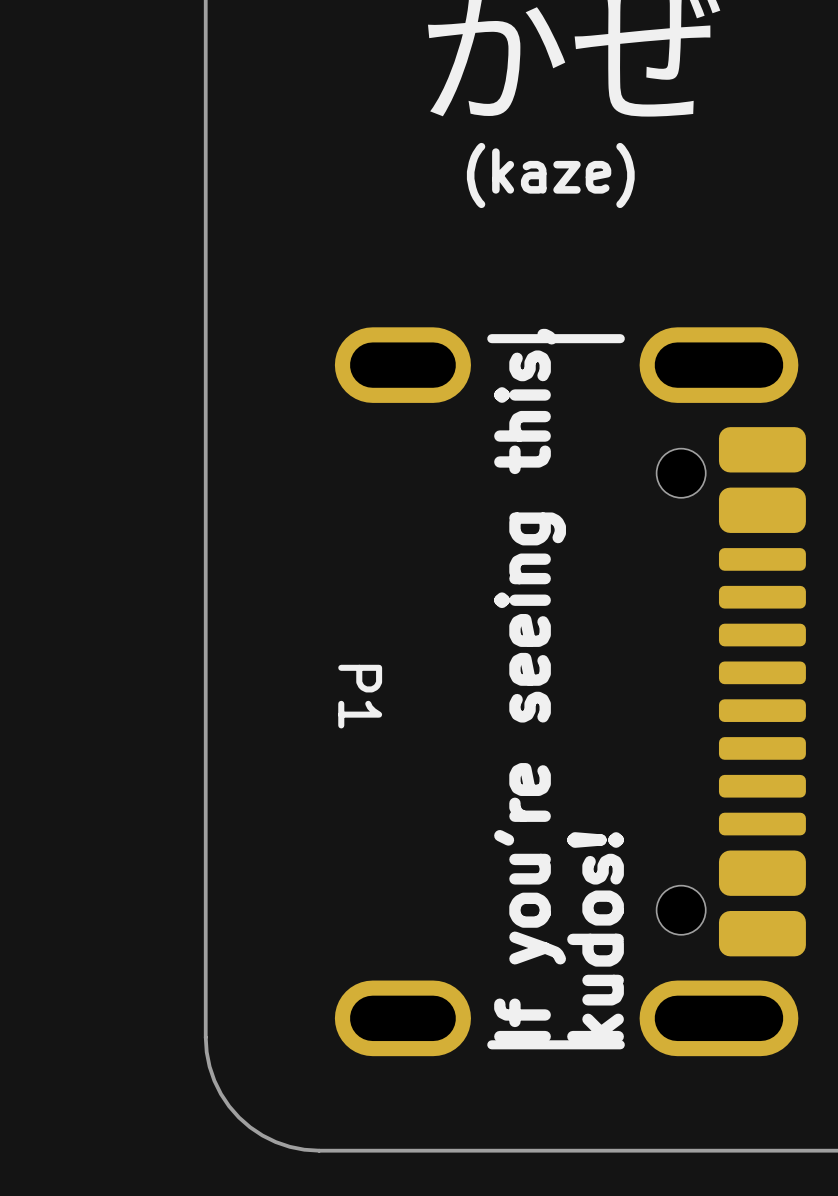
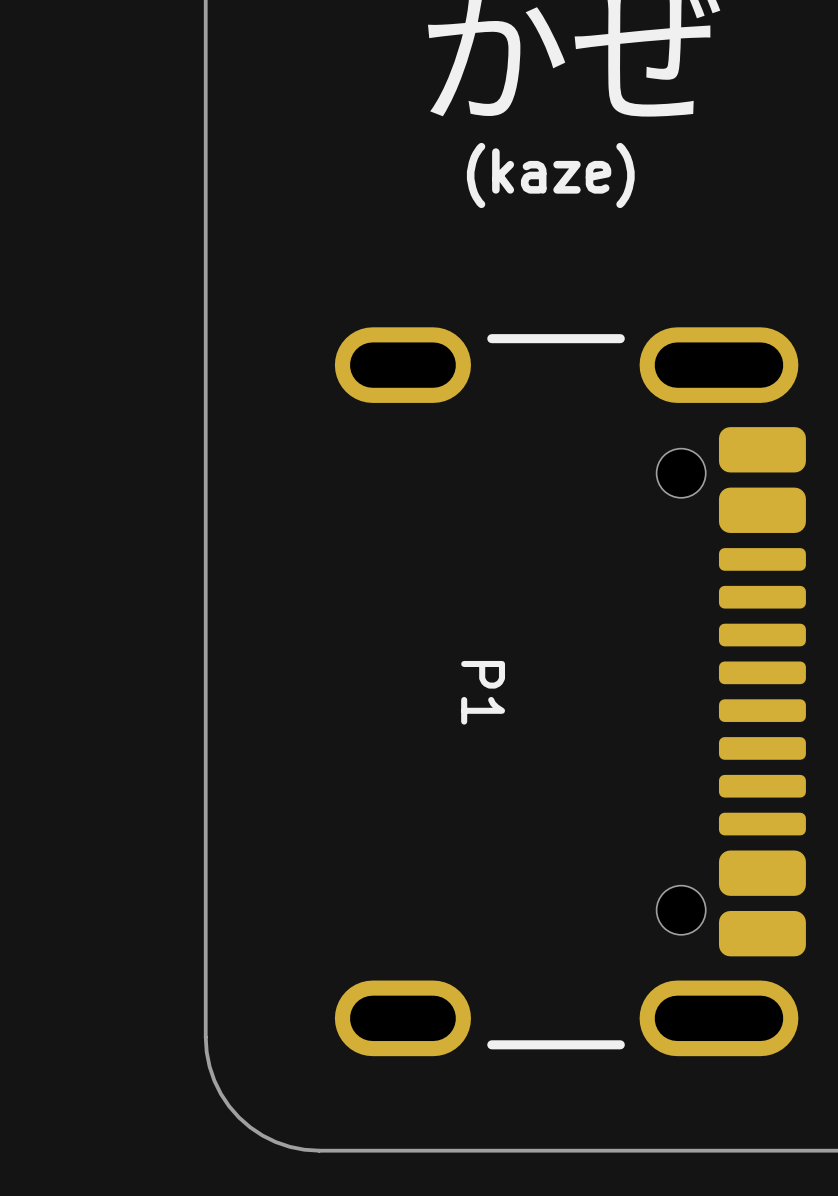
text: If you're seeing this, (530, 685) -> none
P1 name position: P1 (360, 696) -> P1 (483, 692)
text: kudos! (595, 937) -> none

